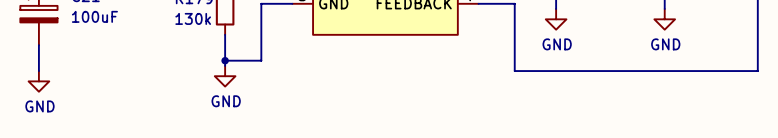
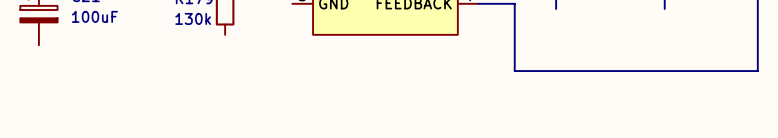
wire: (292, 3) (261, 3) (261, 60) (225, 60) -> none
power symbol: GND (556, 19) -> none
power symbol: GND (664, 19) -> none
wire: (225, 34) (225, 65) -> none
wire: (38, 45) (38, 71) -> none
junction: (225, 60) -> none
power symbol: GND (225, 76) -> none
power symbol: GND (38, 81) -> none

